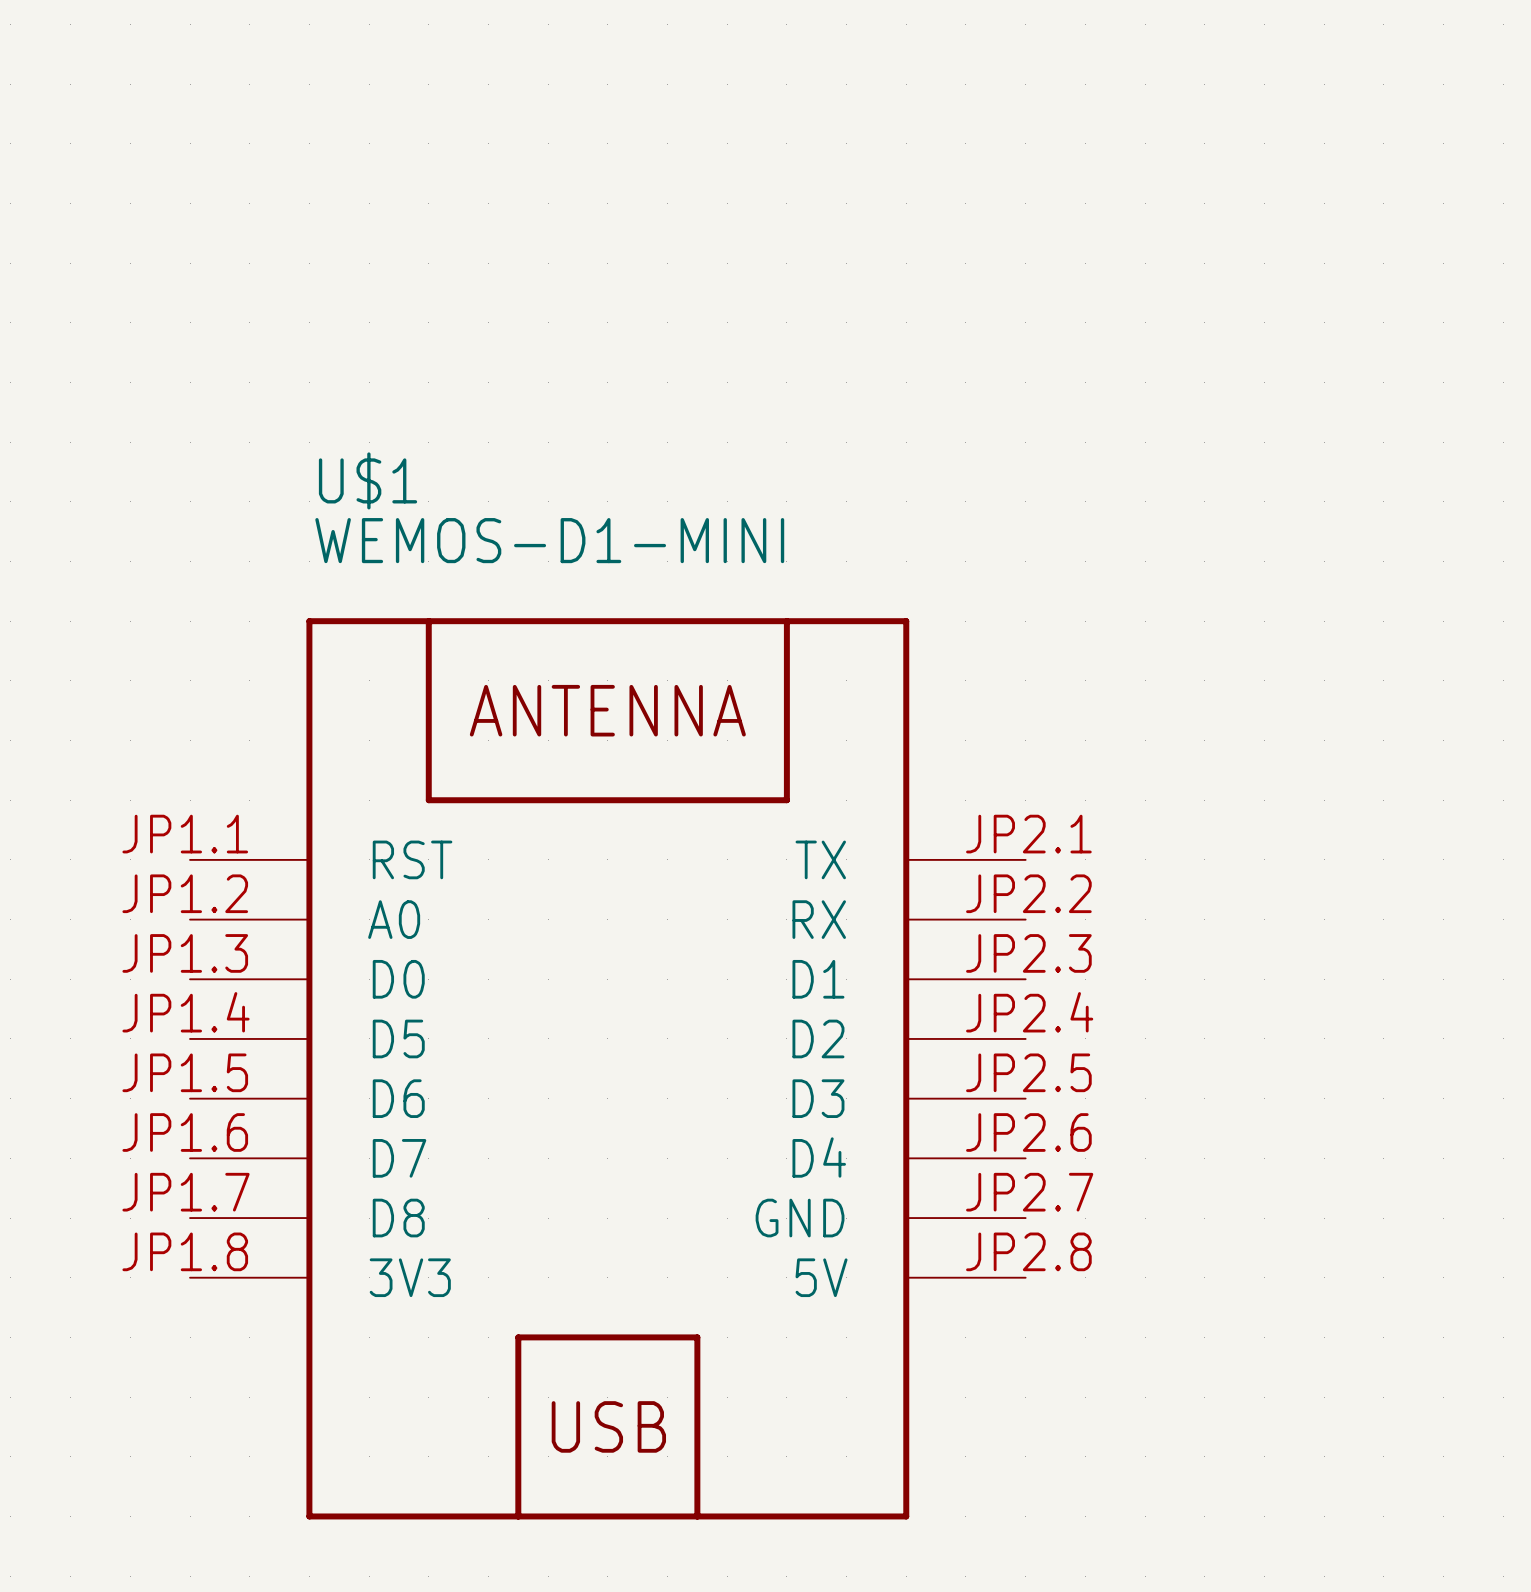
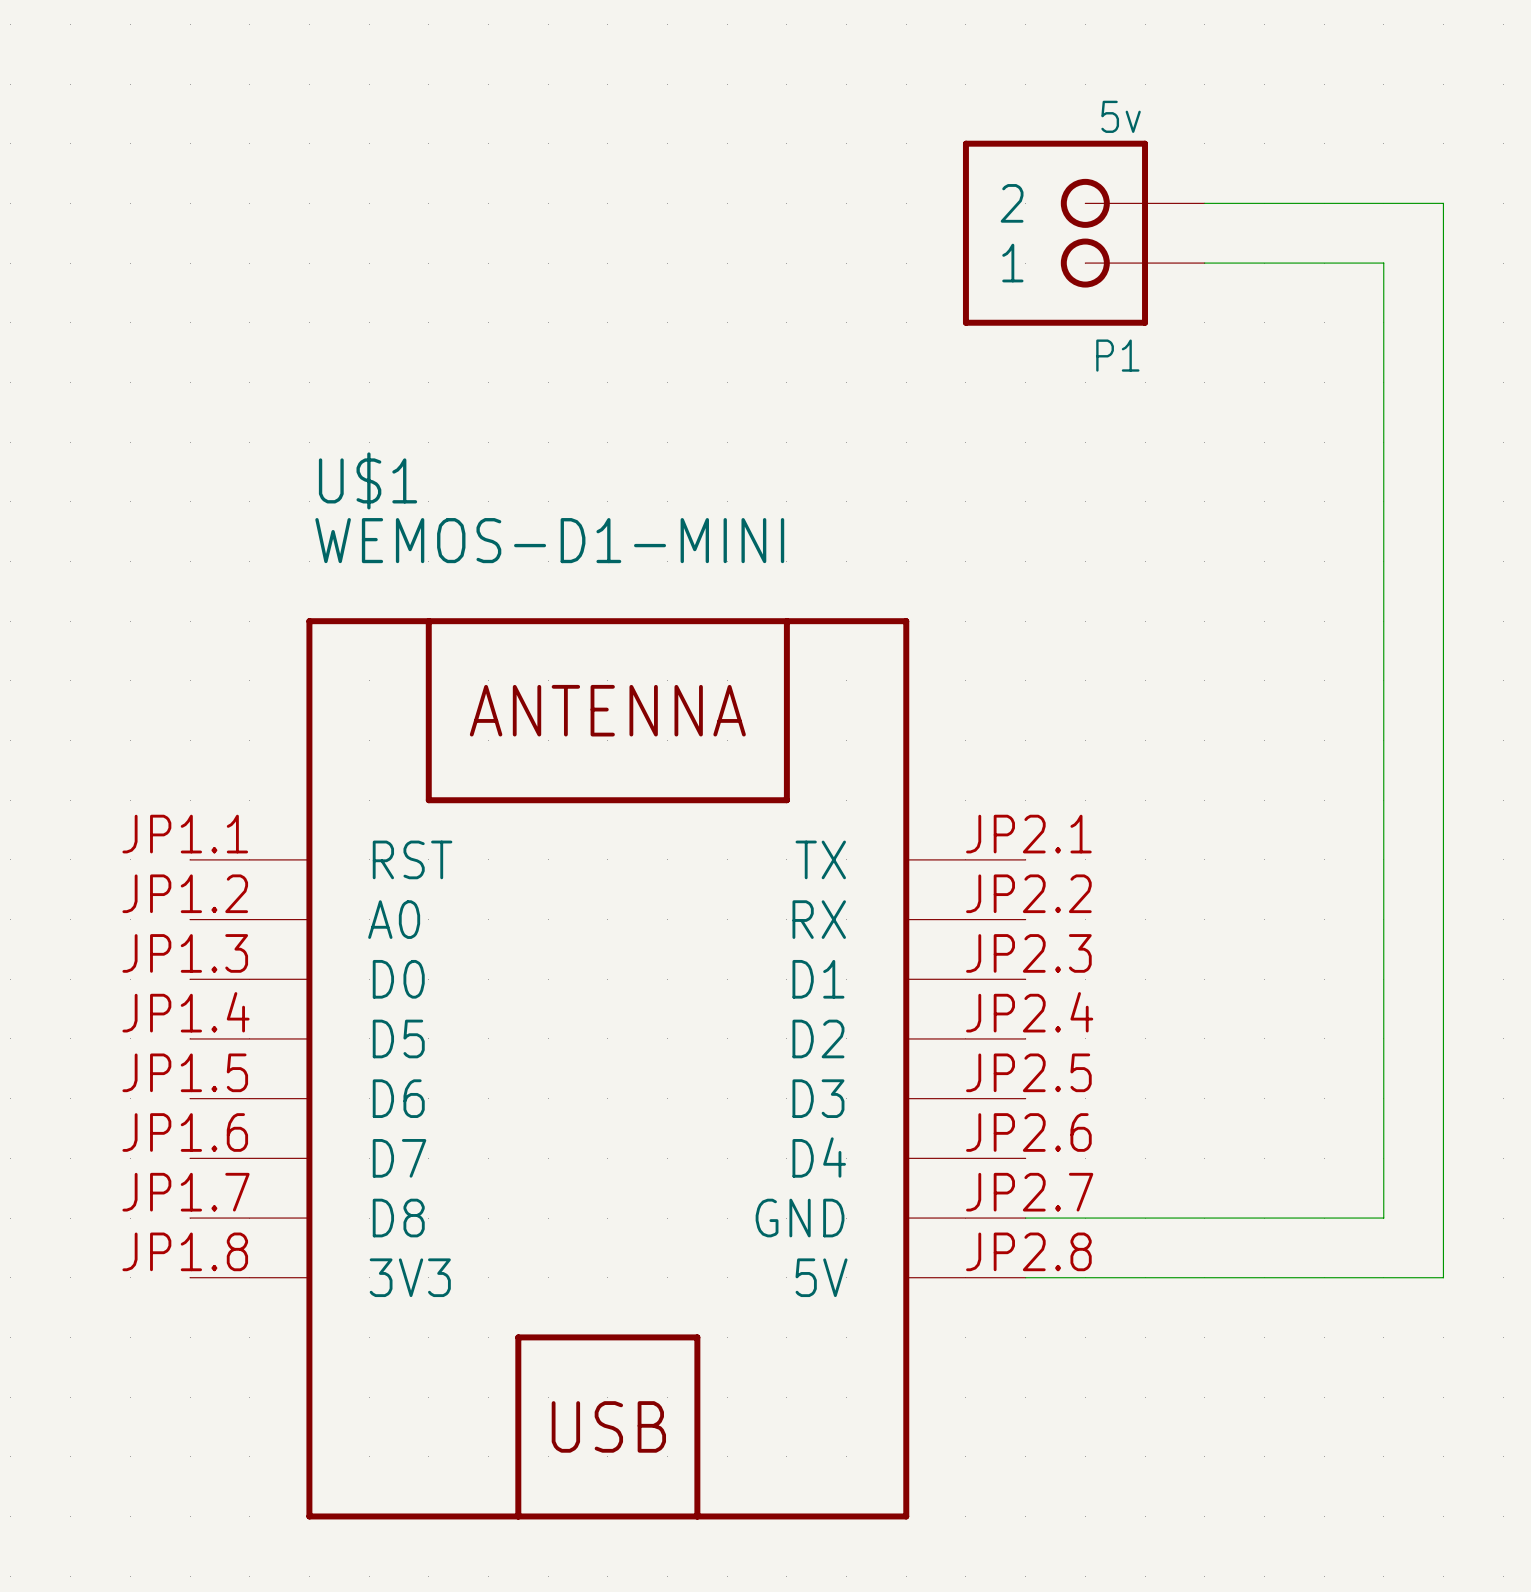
wire: none -> (1204, 203) (1443, 203) (1443, 1277) (1025, 1277)
P1: none -> 5v (1083, 233)
wire: none -> (1204, 263) (1383, 263) (1383, 1218) (1025, 1218)

